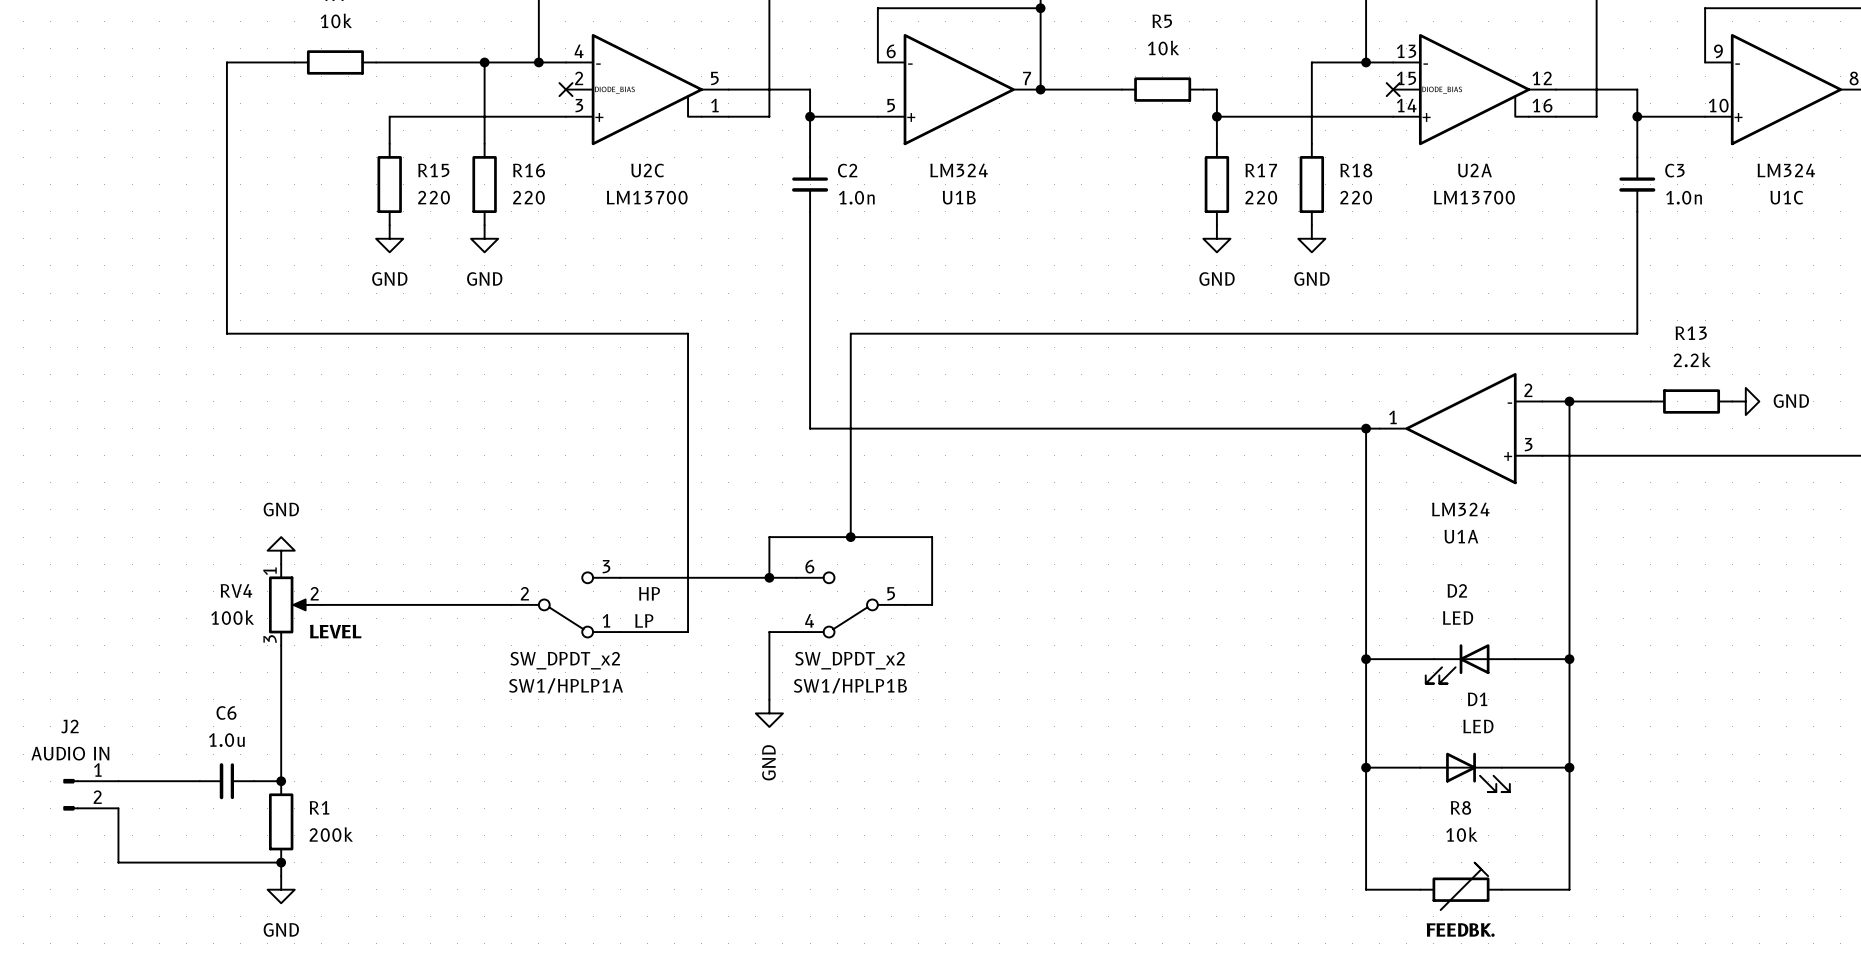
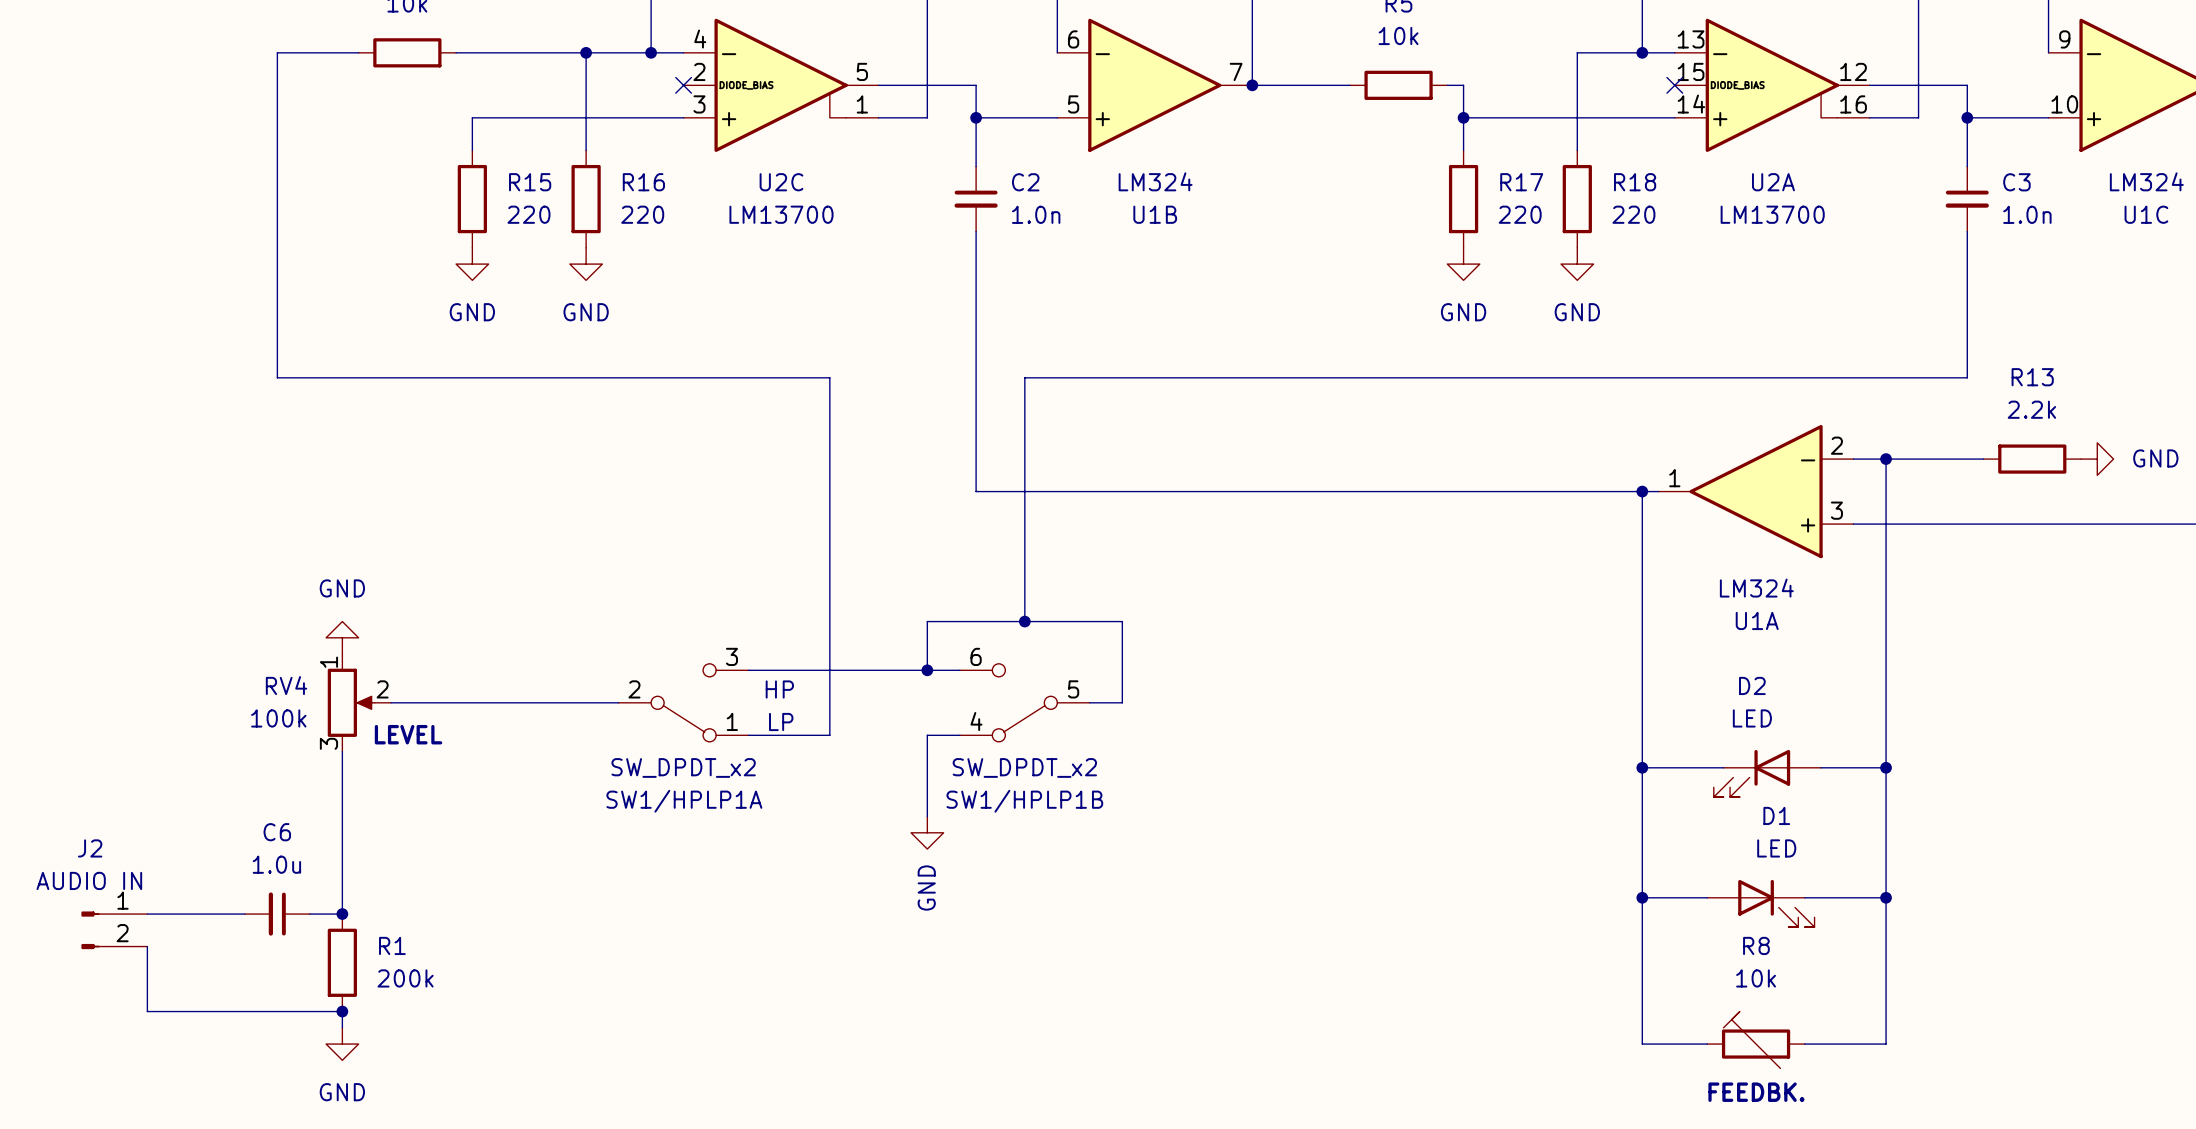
R8 flip: as is (1461, 886) -> left-right (1756, 1039)

